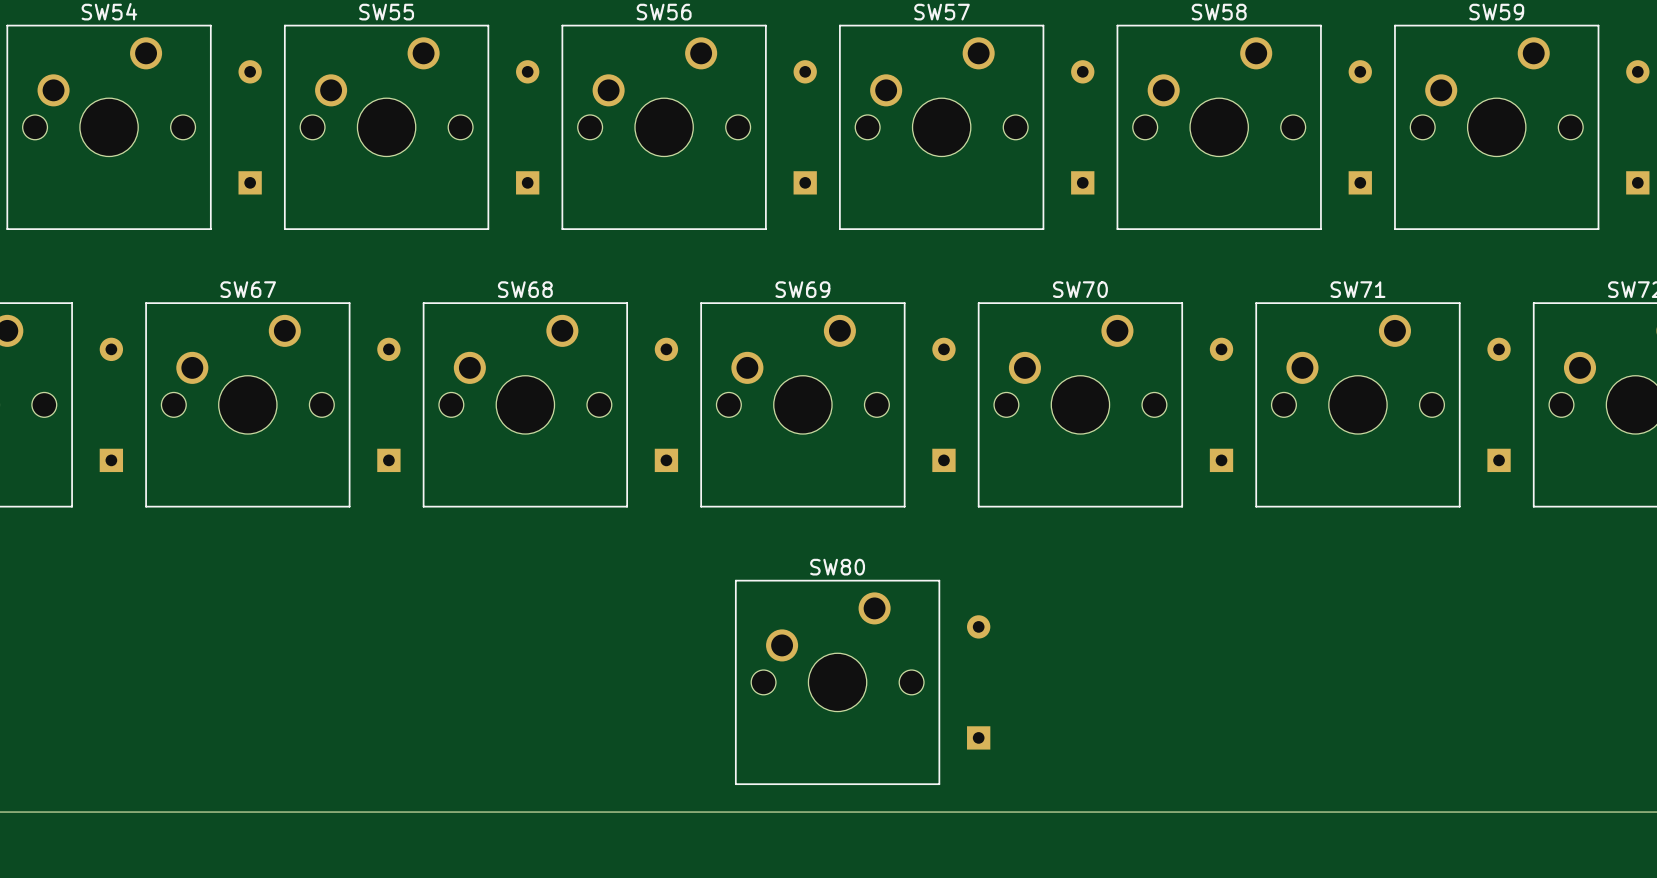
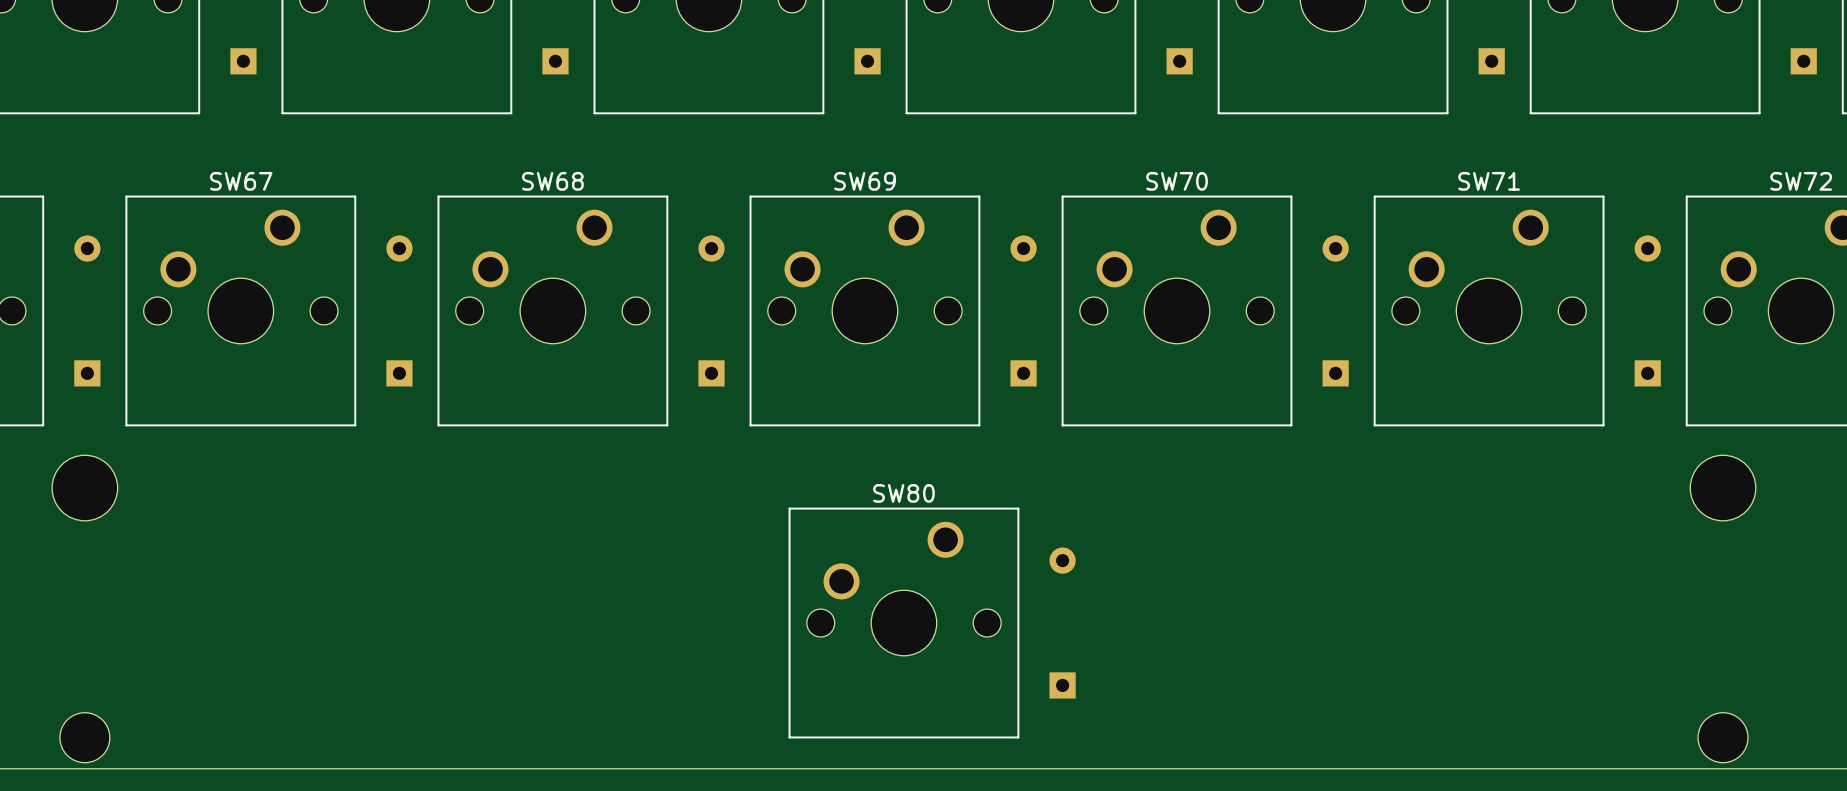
SW80 footprint: [734, 579, 941, 786] -> [52, 455, 1756, 763]

